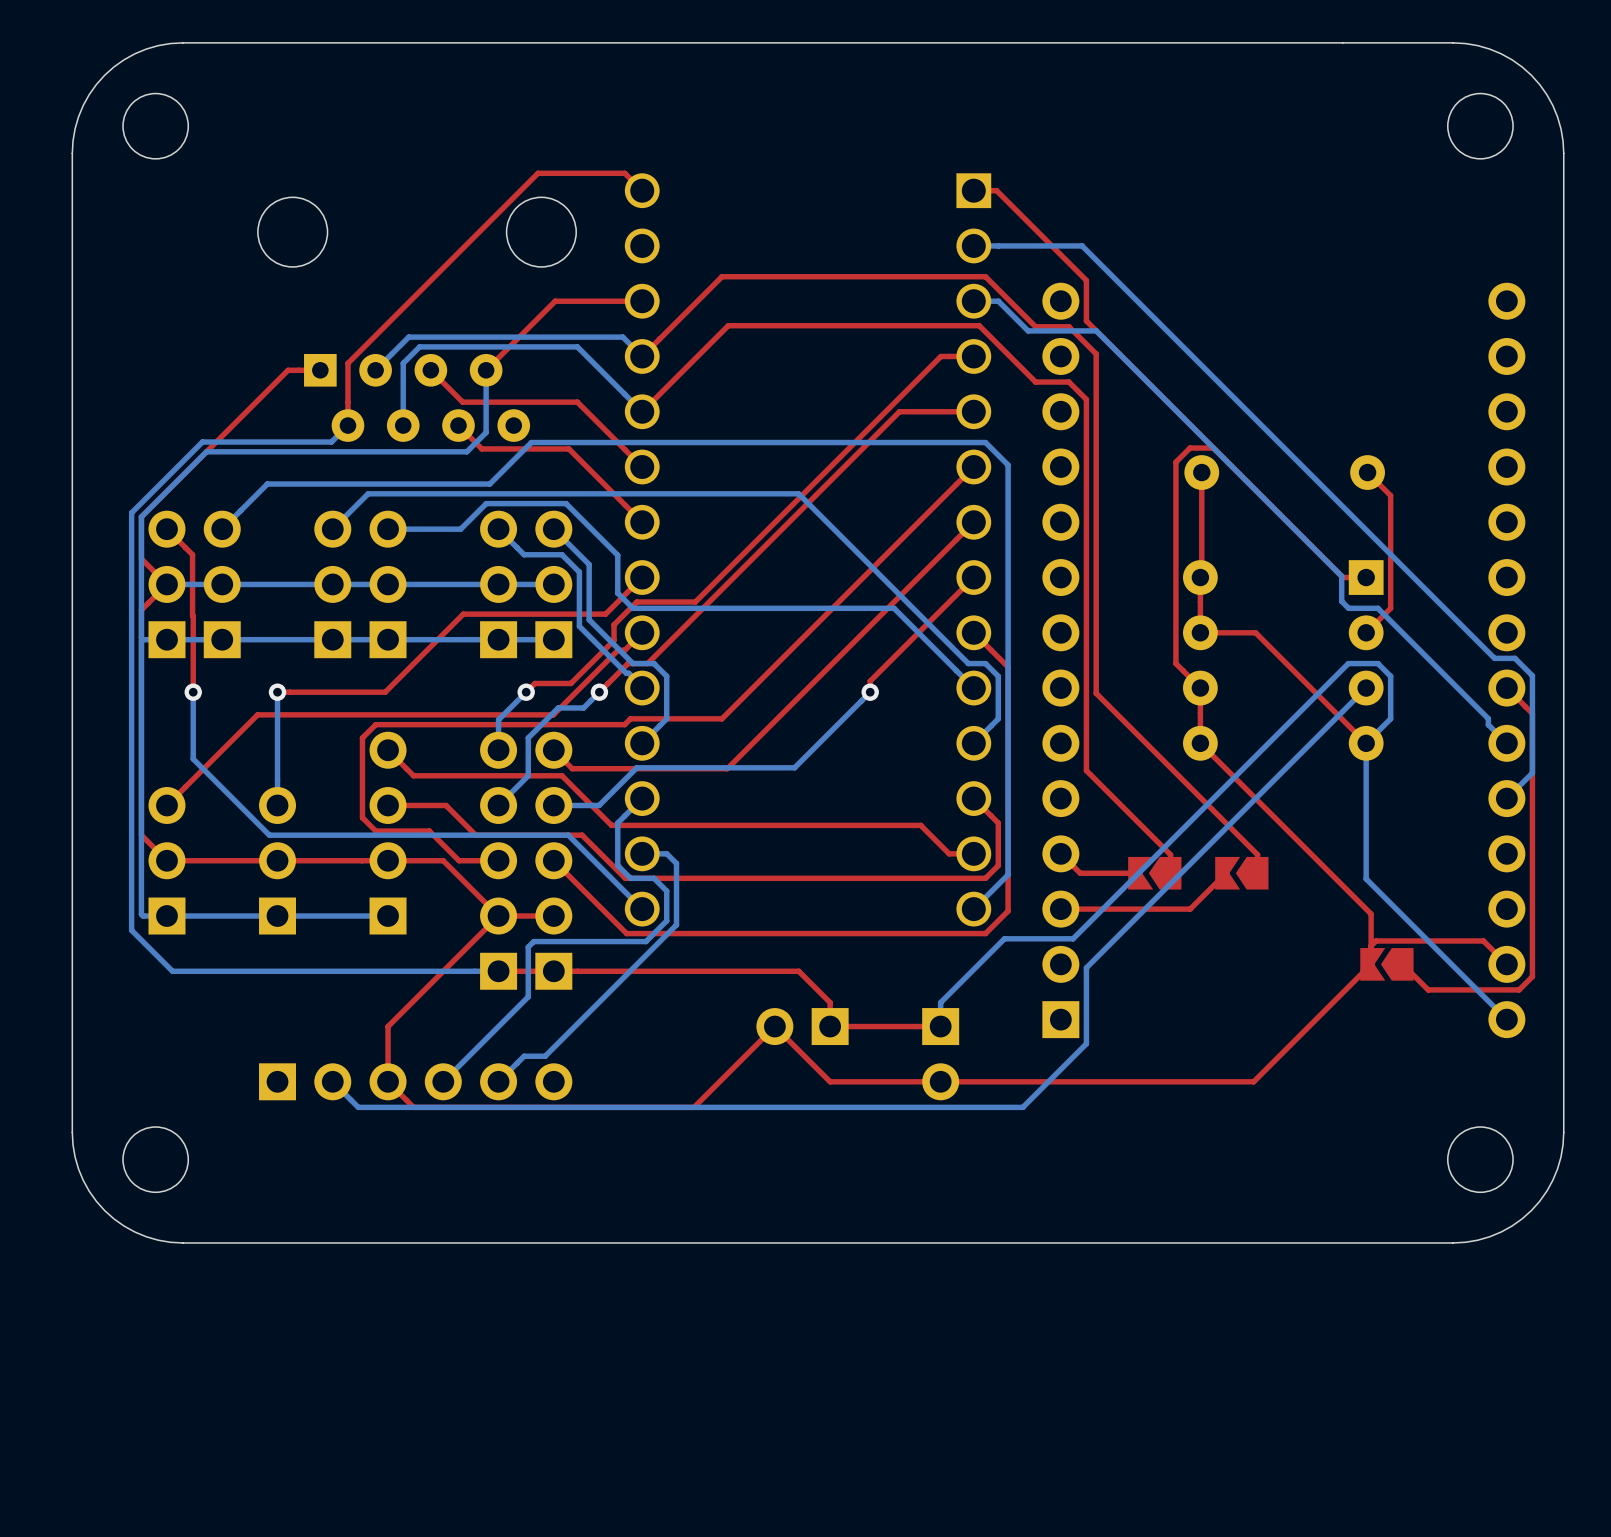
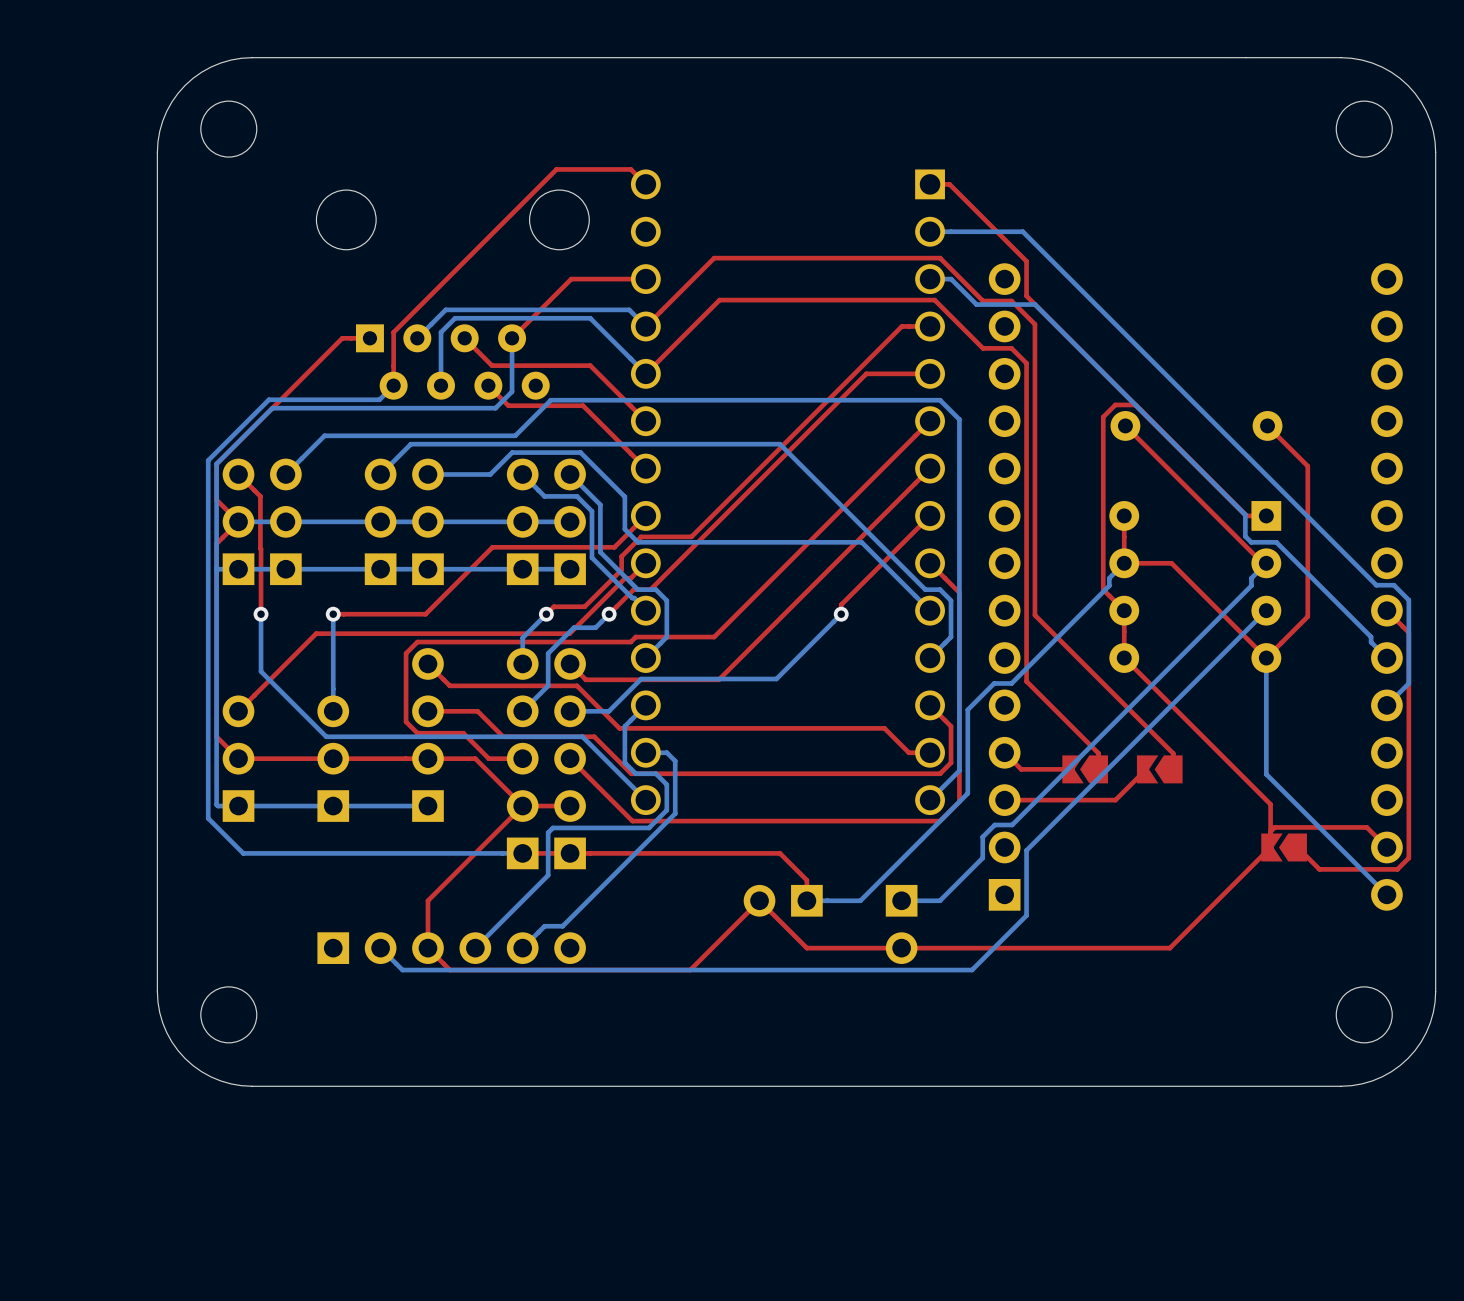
top track: (1201, 472) (1200, 577) -> (1125, 425) (1262, 563) (1266, 563)
top track: (1390, 495) (1390, 608) (1366, 632) -> (1287, 445) (1307, 466) (1307, 616) (1266, 658)
bottom track: none -> (1124, 563) (1109, 578) (1109, 585) (1011, 683) (994, 683) (967, 709) (967, 793) (860, 900) (806, 900)
bottom track: (1366, 743) (1390, 718) (1390, 676) (1377, 663) (1348, 663) (1073, 938) (1004, 938) (940, 1002) (940, 1026) -> (1266, 563) (1251, 578) (1251, 585) (1012, 824) (994, 824) (982, 836) (982, 858) (939, 900) (901, 900)
top track: (940, 1026) (830, 1026) -> none

